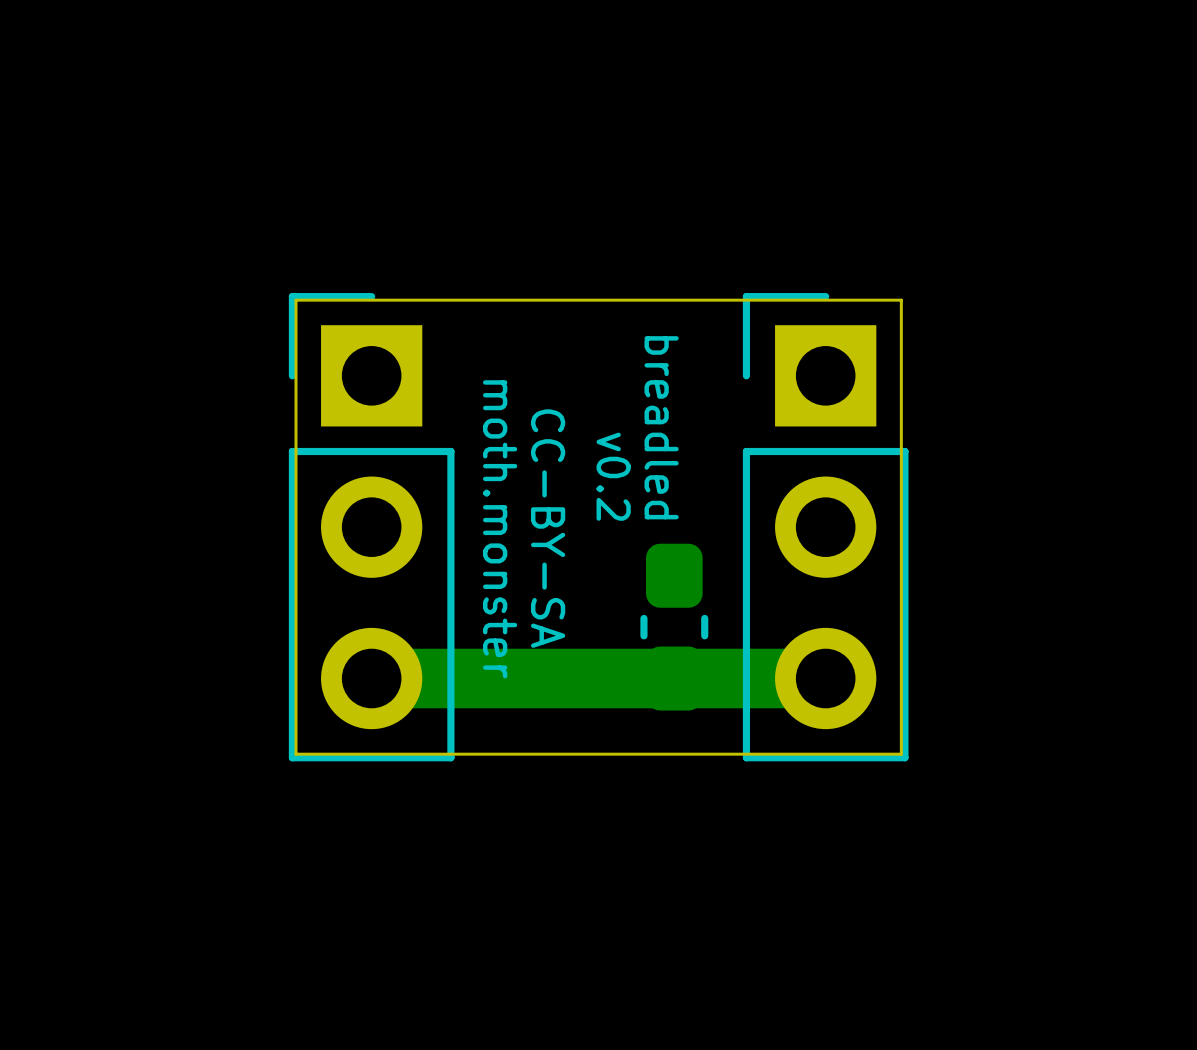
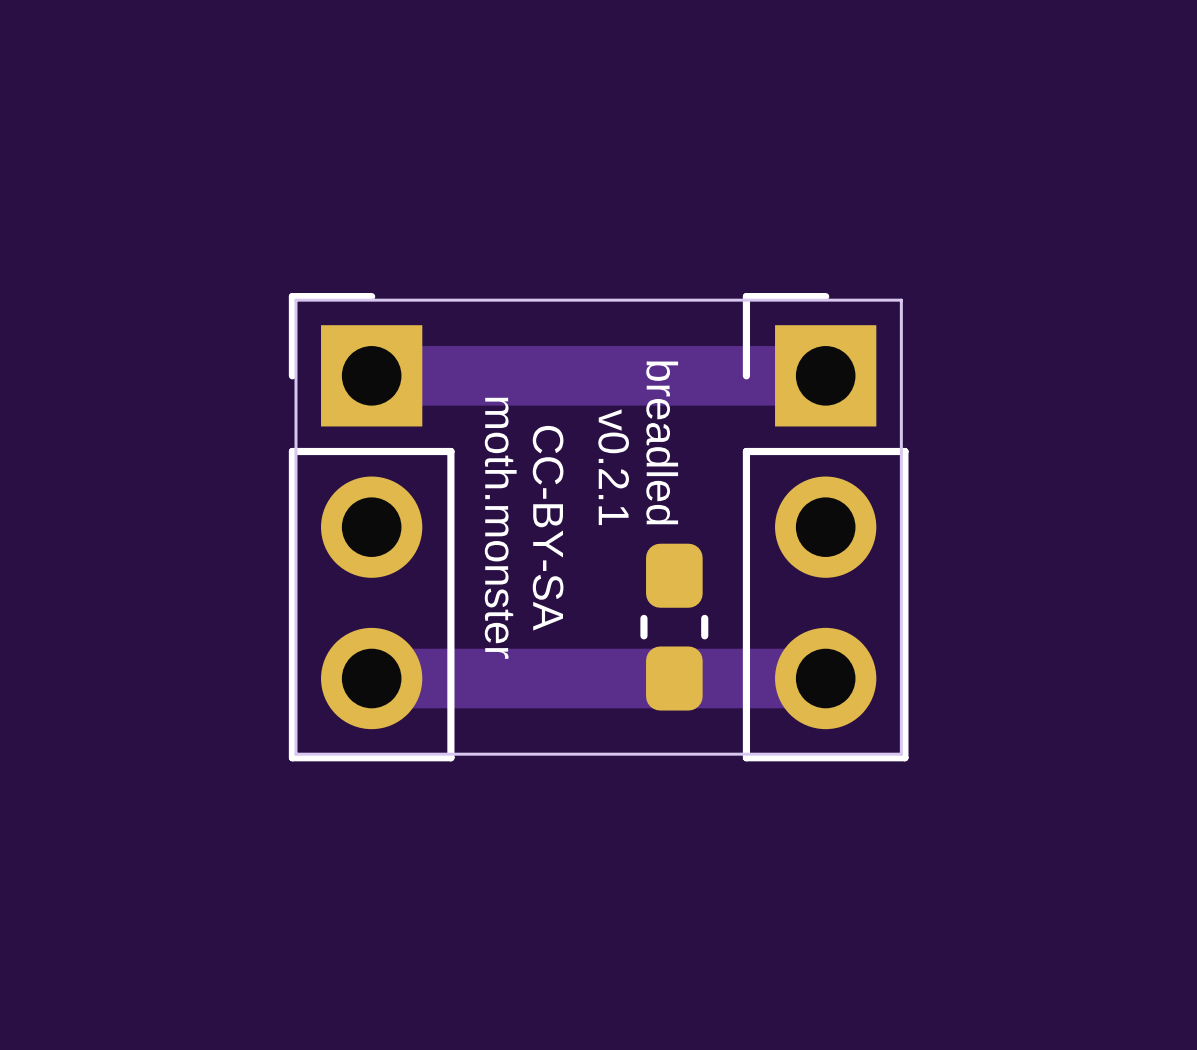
track: none -> (825, 375) (371, 375)
text: v0.2 (613, 476) -> v0.2.1 (613, 467)

